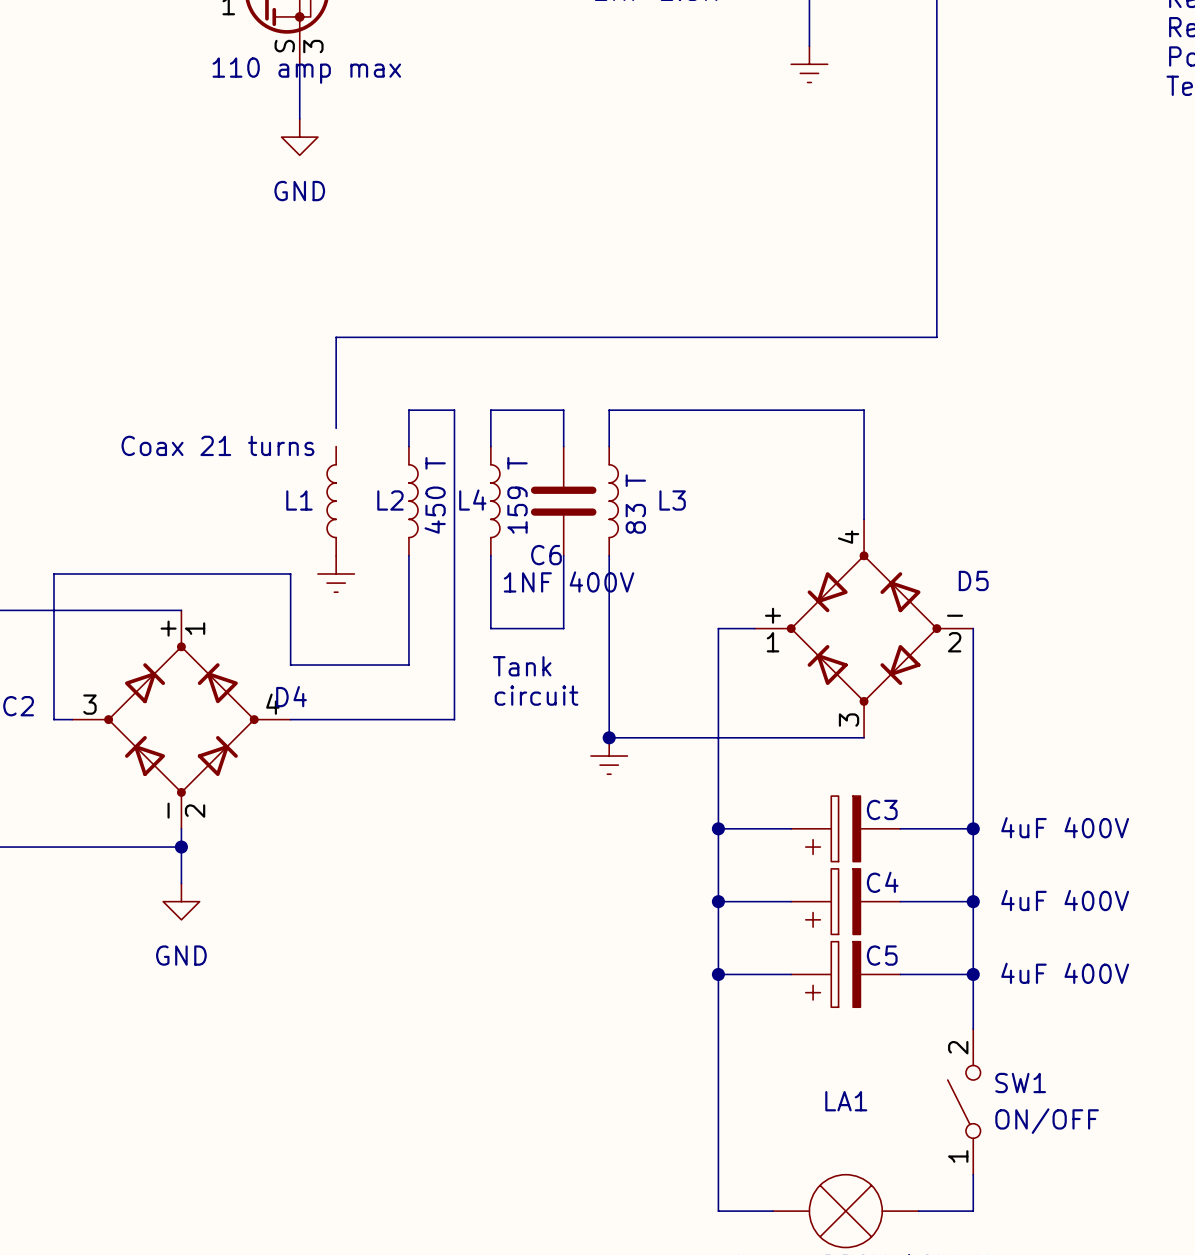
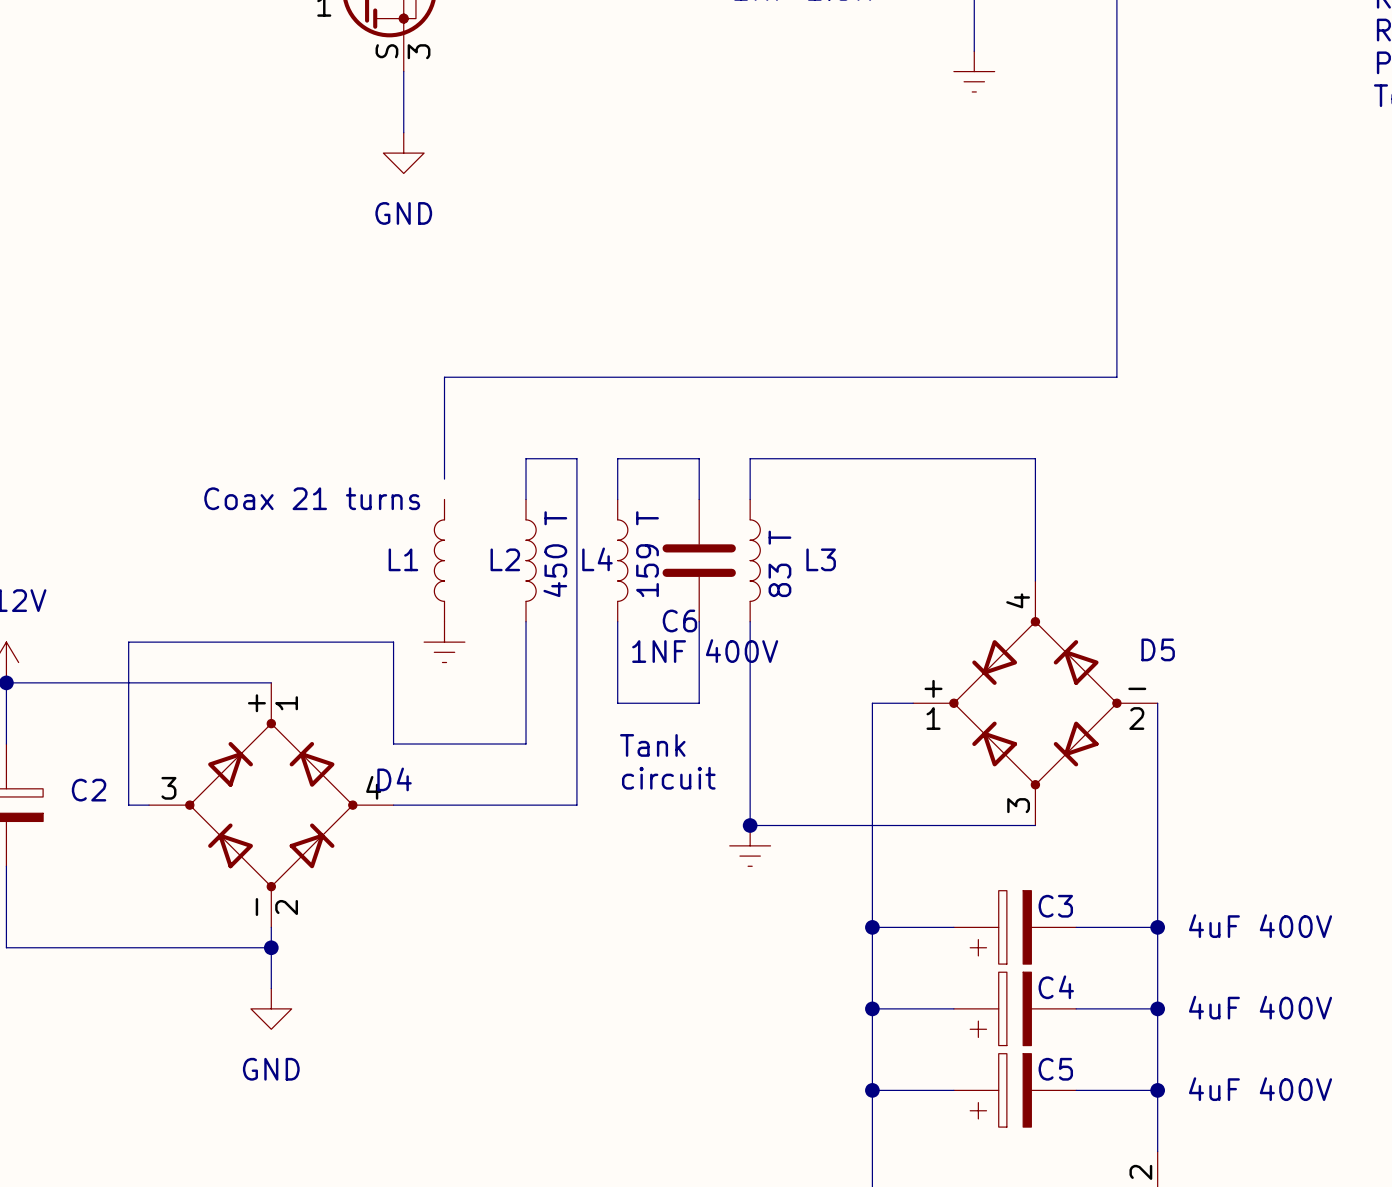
text: 110 amp max (306, 70) -> none

